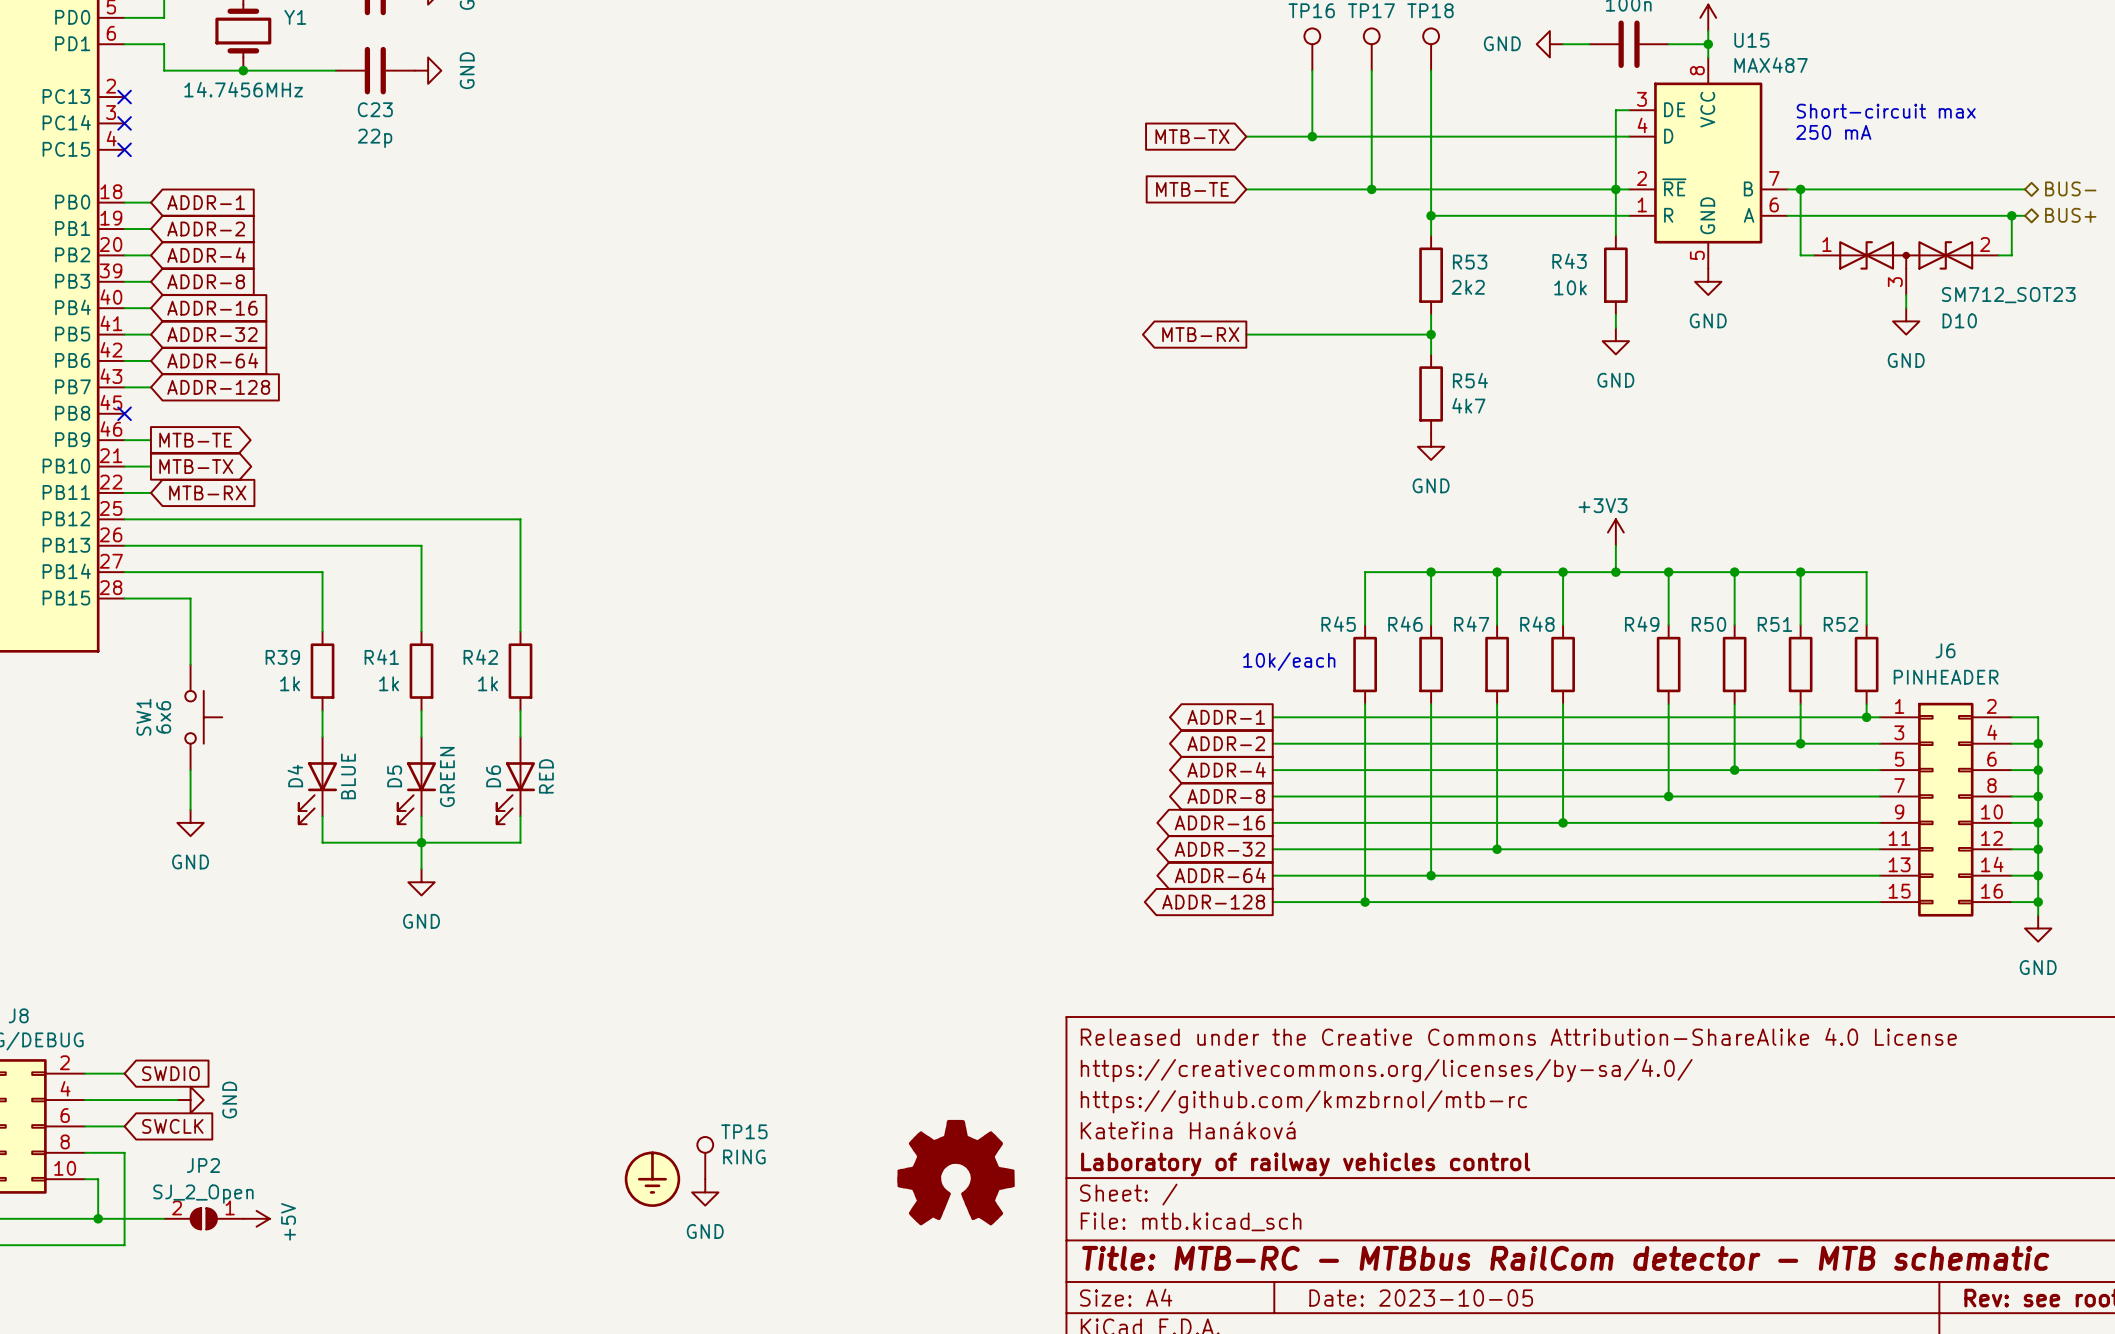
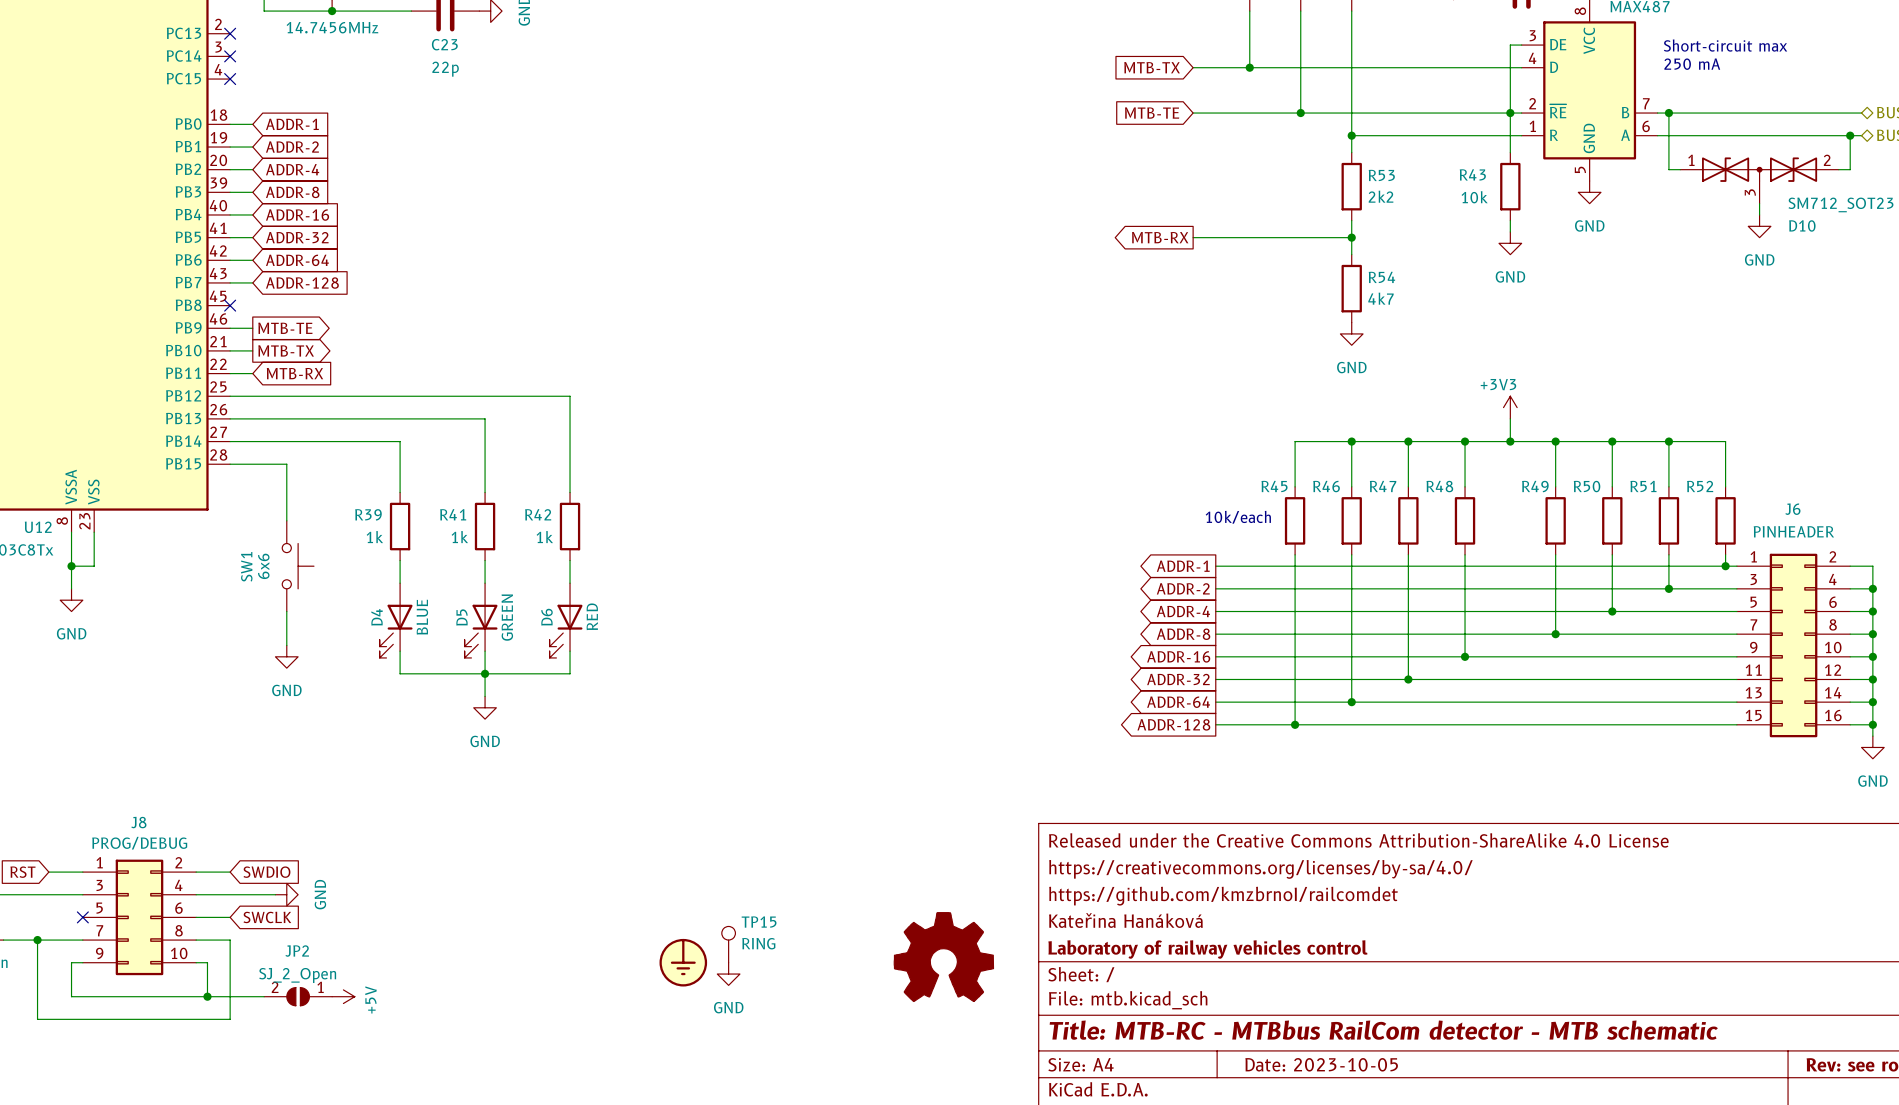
title block: https://github.com/kmzbrnoI/mtb-rc (1303, 1101) -> https://github.com/kmzbrnoI/railcomdet (1223, 896)

